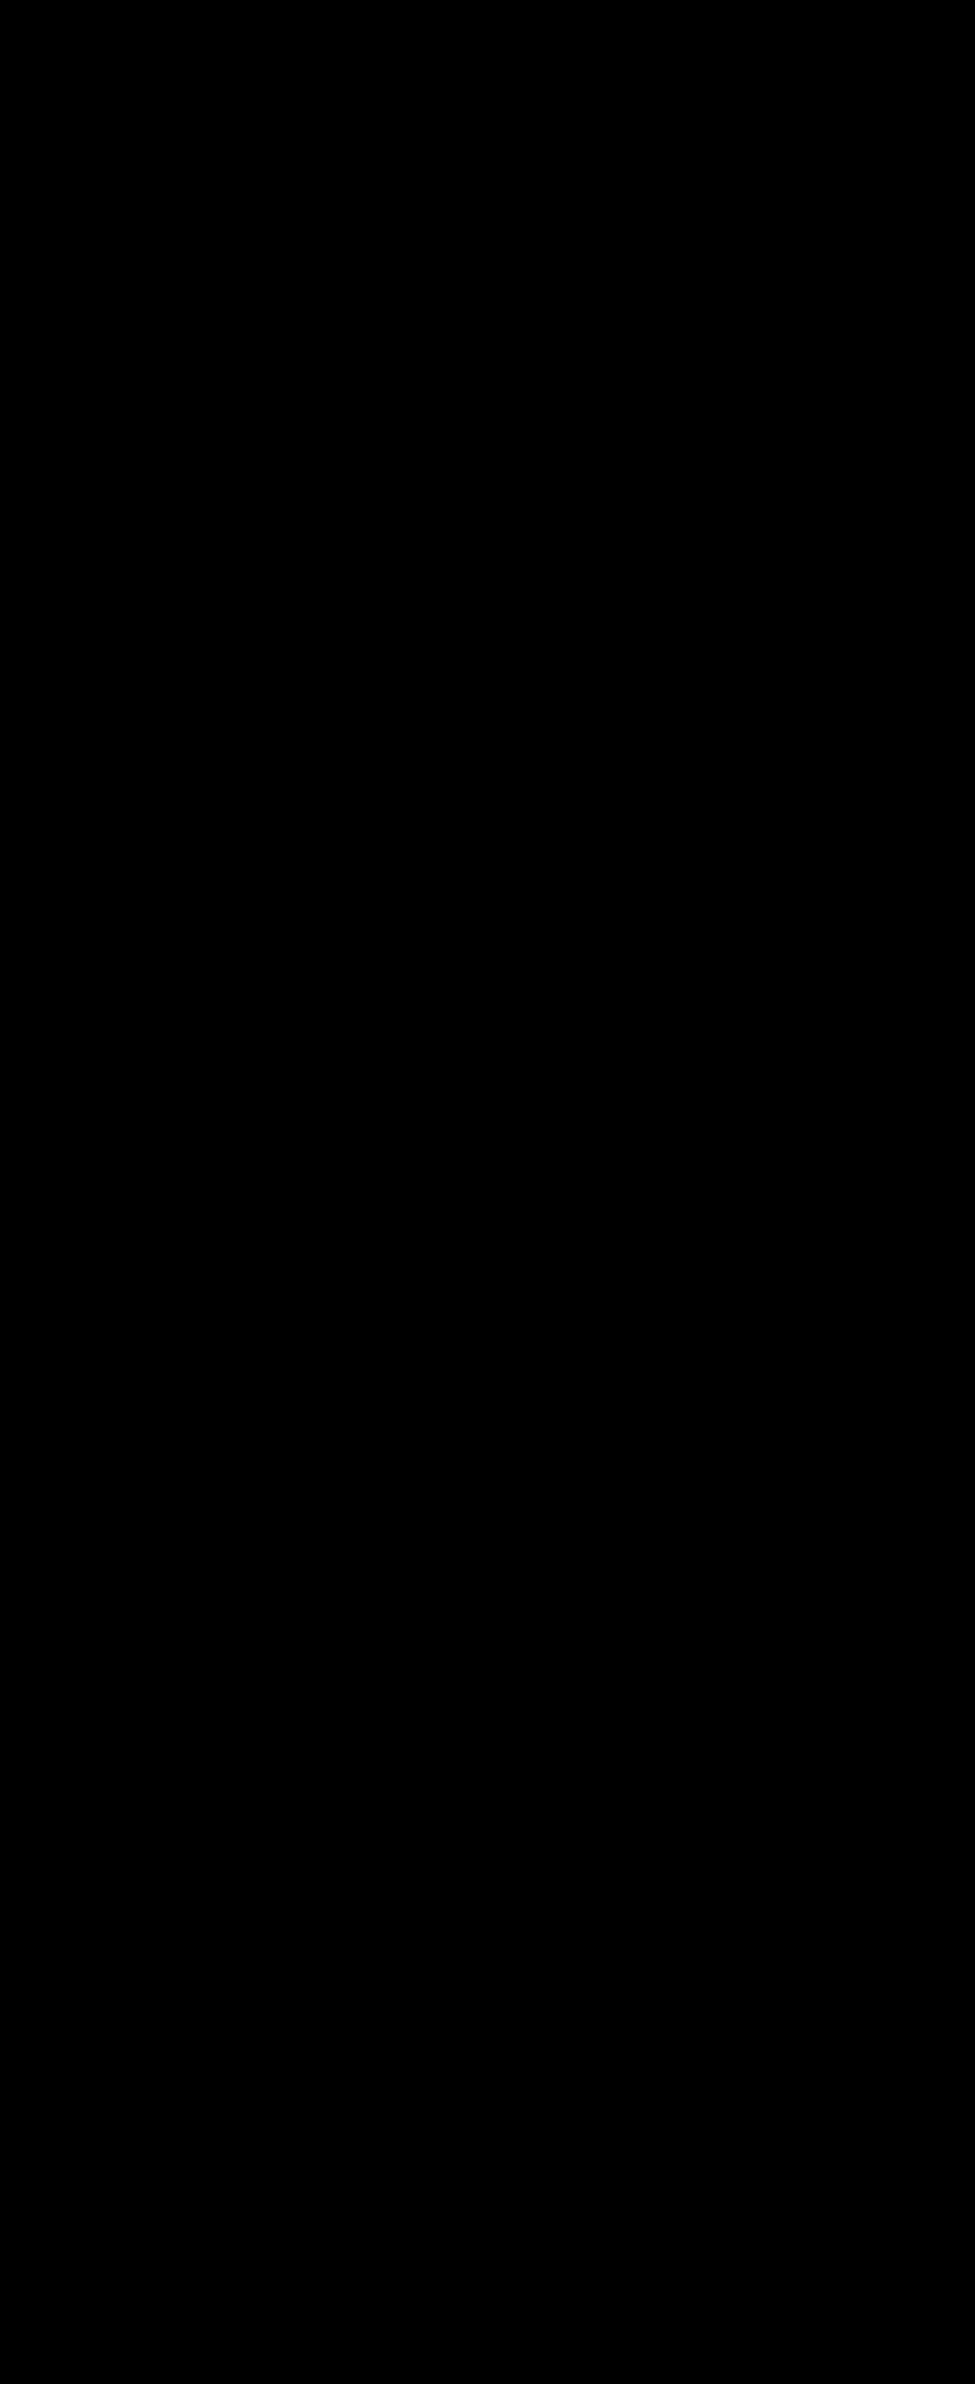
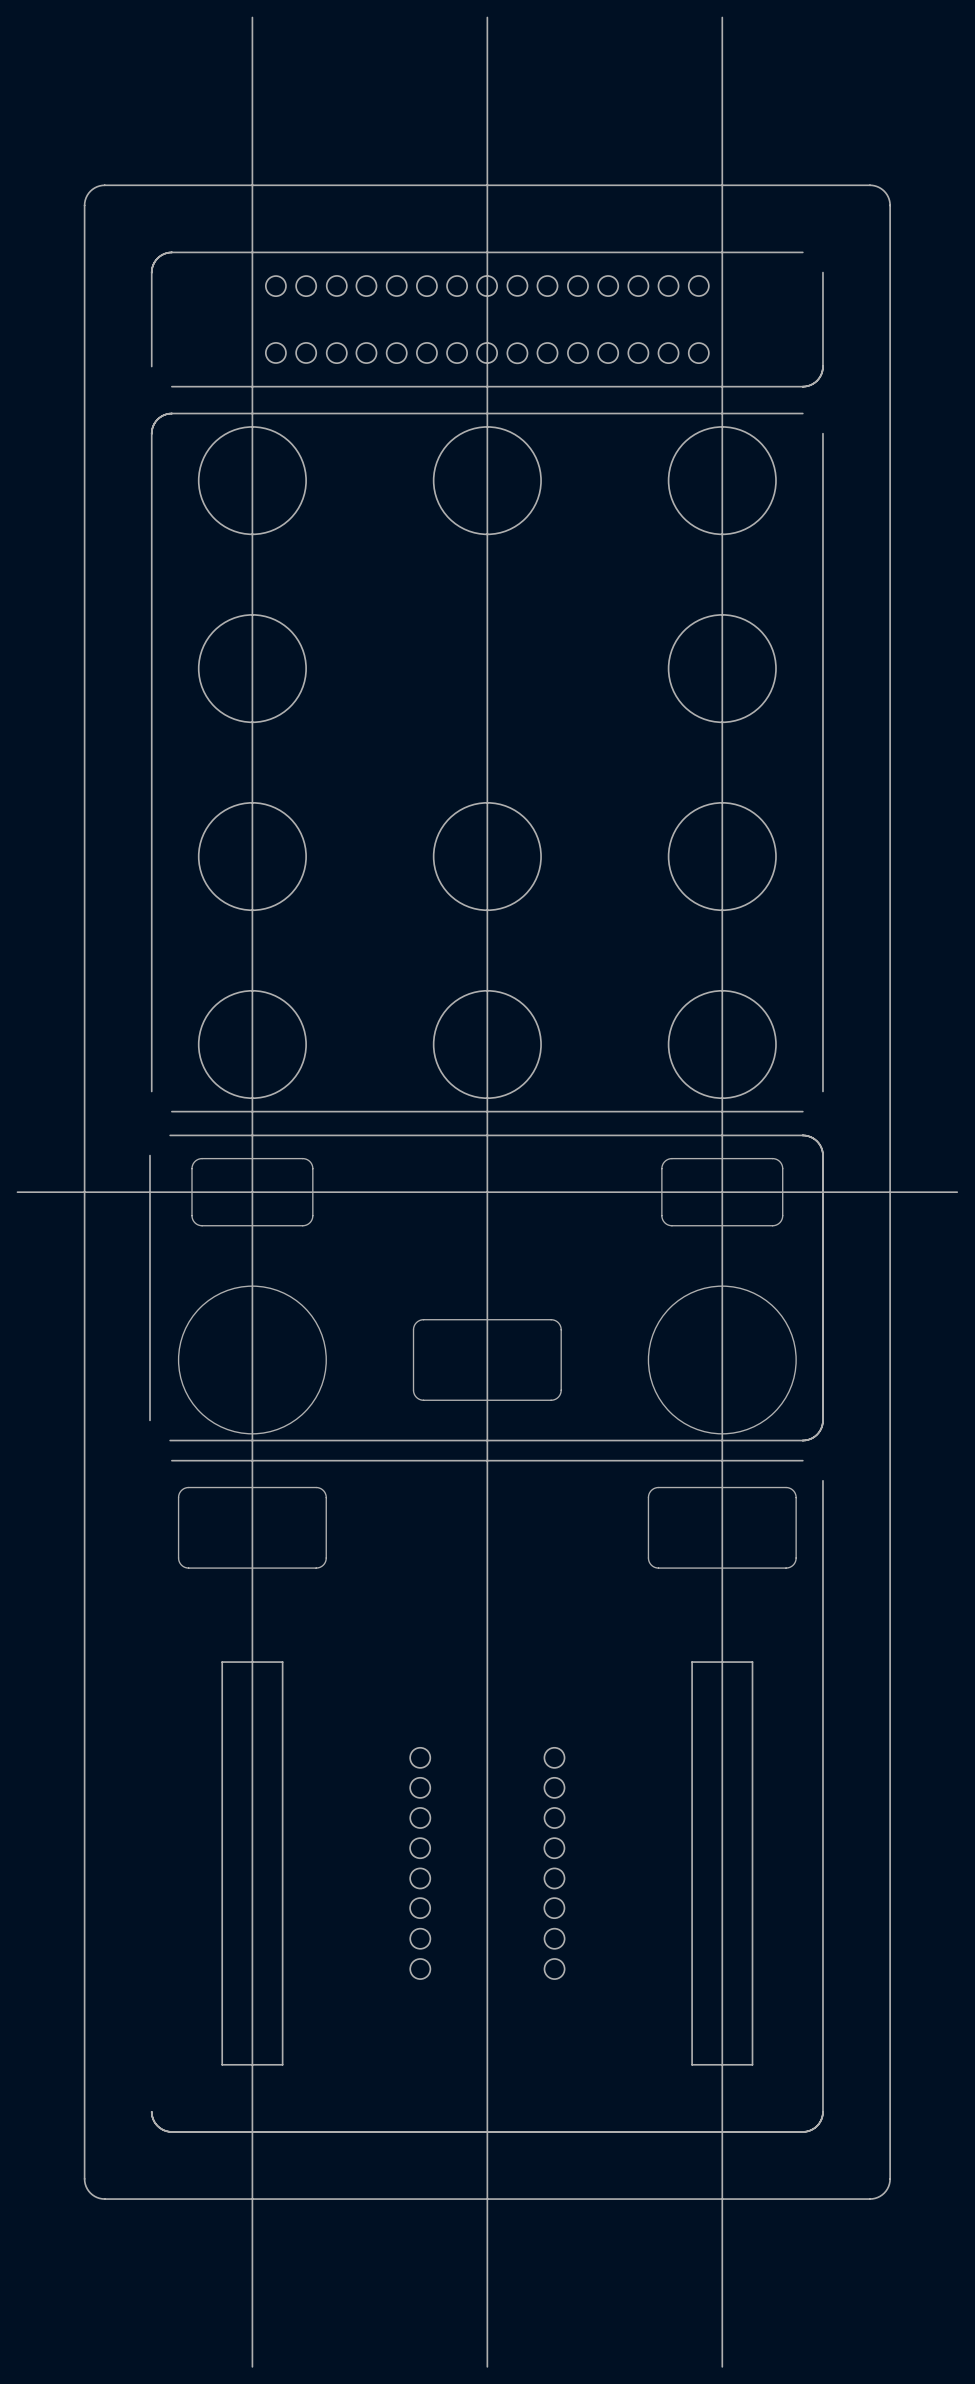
line: none -> (252, 17) (252, 2366)
line: none -> (487, 17) (487, 2366)
line: none -> (722, 17) (722, 2366)
line: none -> (104, 185) (869, 185) (880, 188) (888, 198) (890, 2178) (885, 2191) (877, 2197) (869, 2199) (104, 2199) (94, 2196) (86, 2186) (84, 2178) (84, 205) (86, 197) (90, 191) (97, 186) (104, 185)
line: none -> (171, 252) (802, 252)
line: none -> (171, 252) (164, 253) (157, 258) (153, 264) (151, 272)
line: none -> (171, 252) (164, 253) (157, 258) (153, 264) (151, 272)
line: none -> (151, 272) (151, 366)
line: none -> (822, 272) (822, 366)
drawing: none -> [506, 274, 529, 297]
drawing: none -> [265, 275, 287, 298]
drawing: none -> [295, 275, 318, 298]
drawing: none -> [325, 275, 378, 297]
drawing: none -> [385, 275, 408, 297]
drawing: none -> [416, 275, 438, 298]
drawing: none -> [446, 275, 468, 297]
drawing: none -> [476, 275, 498, 297]
drawing: none -> [536, 275, 559, 297]
drawing: none -> [567, 275, 589, 297]
drawing: none -> [597, 275, 620, 297]
drawing: none -> [627, 275, 650, 297]
drawing: none -> [657, 275, 680, 297]
drawing: none -> [687, 275, 710, 297]
drawing: none -> [265, 342, 287, 364]
drawing: none -> [295, 342, 318, 364]
drawing: none -> [325, 342, 378, 365]
drawing: none -> [385, 342, 408, 365]
drawing: none -> [416, 342, 438, 364]
drawing: none -> [446, 342, 468, 364]
drawing: none -> [476, 342, 498, 364]
drawing: none -> [506, 342, 529, 365]
drawing: none -> [536, 342, 559, 364]
drawing: none -> [567, 342, 589, 364]
drawing: none -> [597, 342, 620, 364]
drawing: none -> [627, 342, 650, 364]
drawing: none -> [657, 342, 680, 365]
drawing: none -> [687, 342, 710, 365]
line: none -> (822, 366) (821, 374) (817, 380) (810, 385) (802, 386)
line: none -> (822, 366) (821, 374) (817, 380) (810, 385) (802, 386)
line: none -> (171, 386) (802, 386)
line: none -> (171, 413) (802, 413)
line: none -> (171, 413) (164, 415) (157, 419) (153, 425) (151, 433)
line: none -> (171, 413) (164, 415) (157, 419) (153, 425) (151, 433)
drawing: none -> [197, 426, 307, 536]
drawing: none -> [432, 426, 542, 536]
drawing: none -> [667, 426, 777, 536]
line: none -> (151, 433) (151, 1091)
line: none -> (822, 433) (822, 1091)
drawing: none -> [197, 614, 307, 724]
drawing: none -> [667, 614, 777, 724]
drawing: none -> [197, 802, 307, 912]
drawing: none -> [432, 802, 542, 912]
drawing: none -> [667, 802, 777, 912]
drawing: none -> [197, 989, 307, 1100]
drawing: none -> [432, 989, 542, 1100]
drawing: none -> [667, 989, 777, 1100]
line: none -> (171, 1111) (802, 1111)
line: none -> (170, 1135) (802, 1135)
line: none -> (802, 1135) (810, 1136) (817, 1141) (821, 1147) (822, 1155)
line: none -> (802, 1135) (810, 1136) (817, 1141) (821, 1147) (822, 1155)
line: none -> (150, 1155) (150, 1420)
line: none -> (822, 1155) (822, 1420)
line: none -> (202, 1158) (308, 1160) (312, 1168) (311, 1221) (302, 1225) (196, 1224) (192, 1216) (192, 1167) (195, 1160) (202, 1158)
line: none -> (671, 1158) (777, 1160) (782, 1168) (781, 1221) (772, 1225) (666, 1224) (661, 1216) (661, 1167) (665, 1160) (671, 1158)
line: none -> (17, 1192) (957, 1192)
drawing: none -> [177, 1285, 327, 1435]
drawing: none -> [647, 1285, 797, 1435]
line: none -> (423, 1319) (555, 1320) (561, 1328) (560, 1394) (556, 1398) (551, 1400) (419, 1399) (413, 1391) (413, 1329) (416, 1322) (423, 1319)
line: none -> (822, 1420) (821, 1428) (817, 1434) (810, 1439) (802, 1440)
line: none -> (822, 1420) (821, 1428) (817, 1434) (810, 1439) (802, 1440)
line: none -> (170, 1440) (802, 1440)
line: none -> (171, 1460) (802, 1460)
line: none -> (822, 1480) (822, 2111)
line: none -> (188, 1487) (320, 1488) (326, 1496) (325, 1562) (321, 1566) (316, 1568) (184, 1567) (178, 1559) (178, 1497) (181, 1490) (188, 1487)
line: none -> (658, 1487) (790, 1488) (796, 1496) (795, 1562) (791, 1566) (786, 1568) (654, 1567) (648, 1559) (648, 1497) (651, 1490) (658, 1487)
line: none -> (222, 1662) (282, 1662) (282, 2064) (222, 2064) (222, 1662)
line: none -> (692, 1662) (752, 1662) (752, 2064) (692, 2064) (692, 1662)
drawing: none -> [409, 1746, 432, 1769]
drawing: none -> [543, 1746, 566, 1769]
drawing: none -> [409, 1776, 432, 1799]
drawing: none -> [543, 1776, 566, 1799]
drawing: none -> [409, 1807, 432, 1829]
drawing: none -> [543, 1807, 566, 1829]
drawing: none -> [409, 1837, 432, 1860]
drawing: none -> [543, 1837, 566, 1860]
drawing: none -> [409, 1867, 432, 1920]
drawing: none -> [543, 1867, 566, 1920]
drawing: none -> [409, 1927, 432, 1950]
drawing: none -> [543, 1927, 566, 1950]
drawing: none -> [409, 1958, 432, 1980]
drawing: none -> [543, 1958, 566, 1980]
line: none -> (822, 2111) (821, 2119) (817, 2126) (810, 2130) (802, 2131)
line: none -> (822, 2111) (821, 2119) (817, 2126) (810, 2130) (802, 2131)
line: none -> (171, 2131) (802, 2131)
line: none -> (171, 2131) (164, 2130) (157, 2126) (153, 2119) (151, 2111) (151, 2114) (153, 2119) (155, 2124) (157, 2126) (159, 2127) (164, 2130) (166, 2131) (171, 2131)

